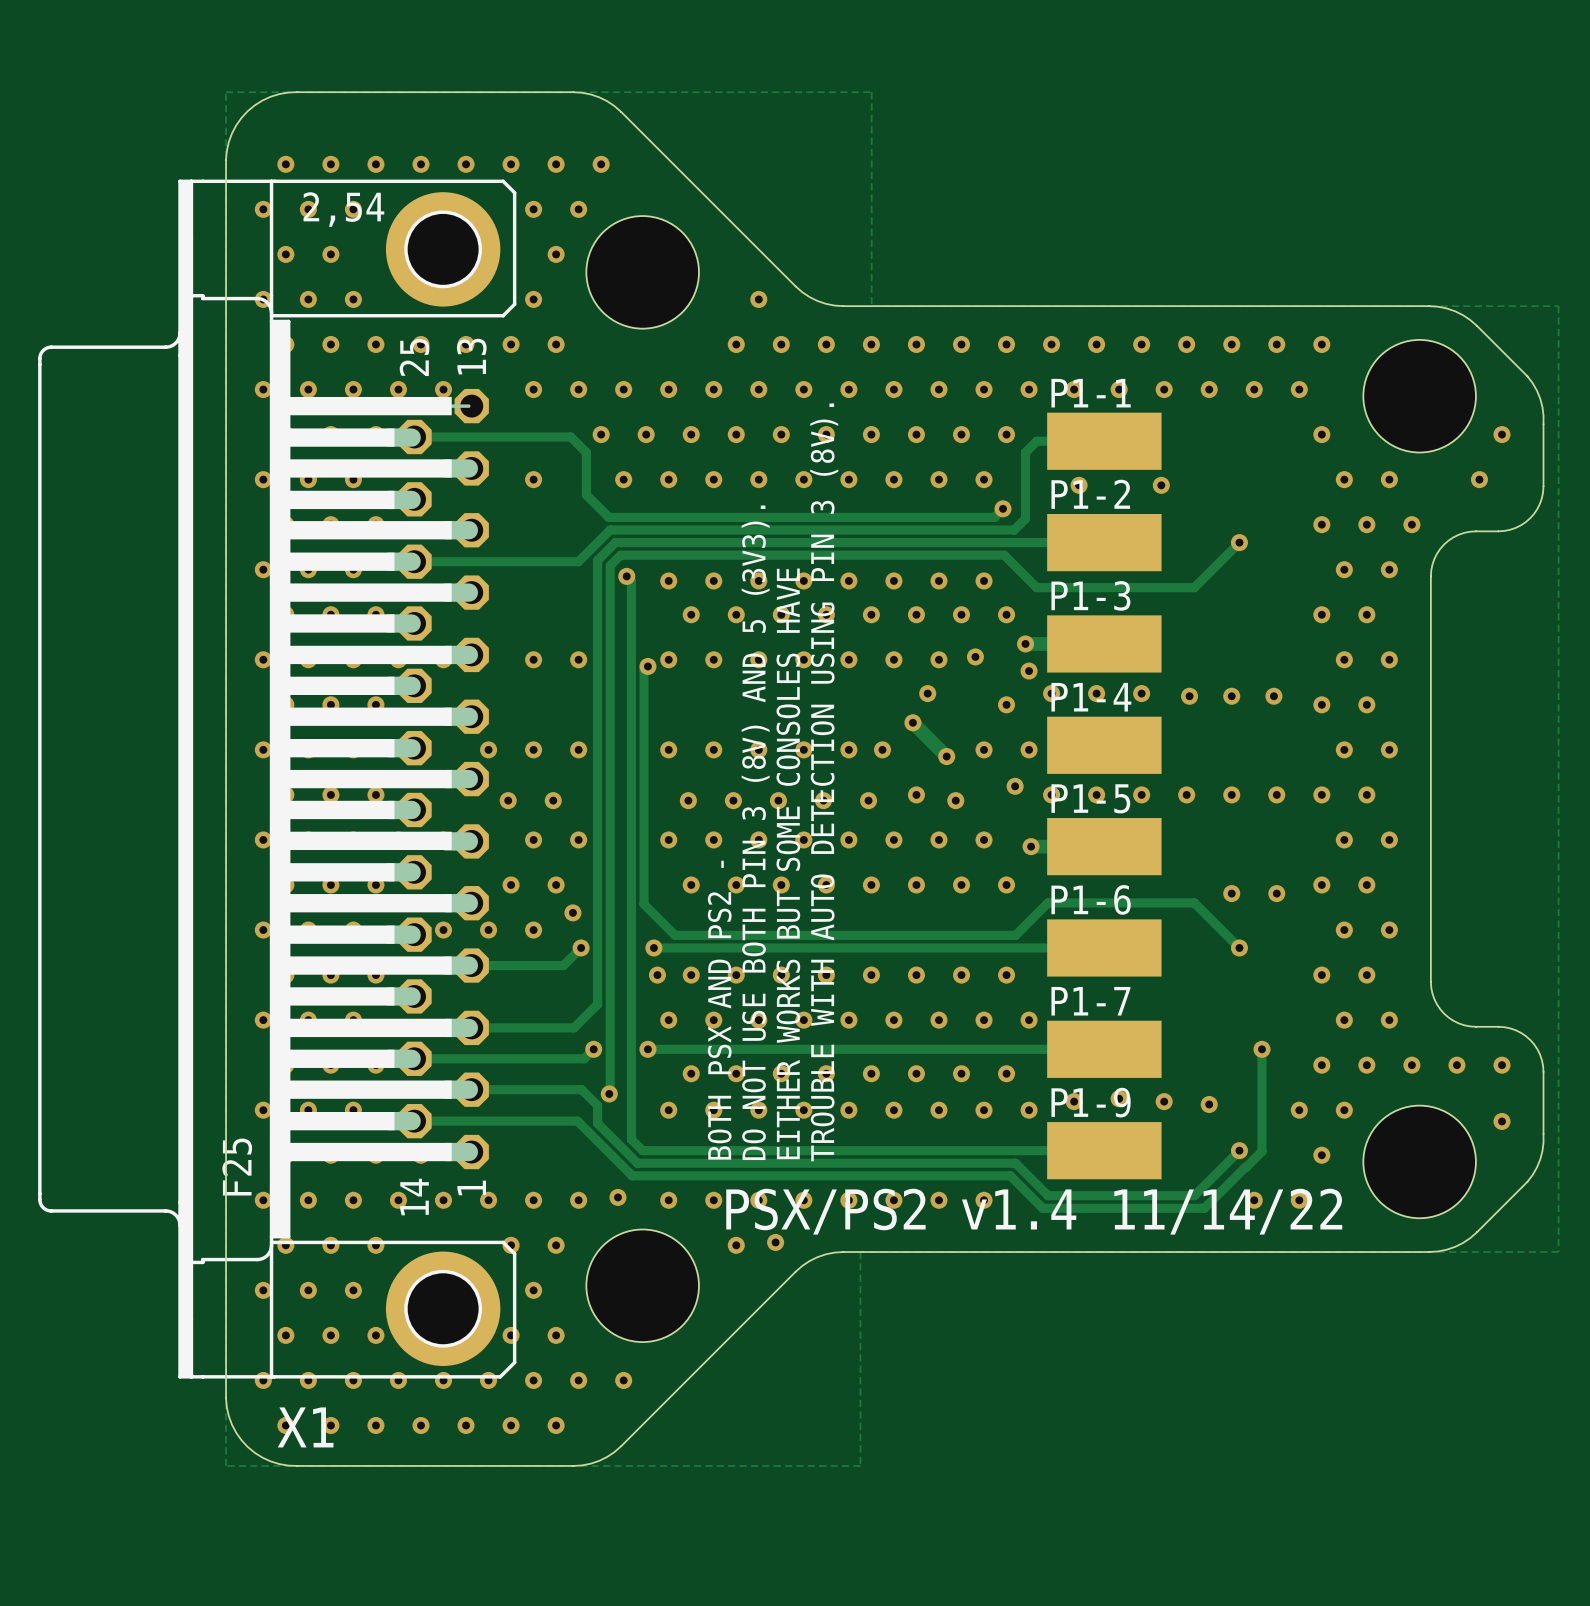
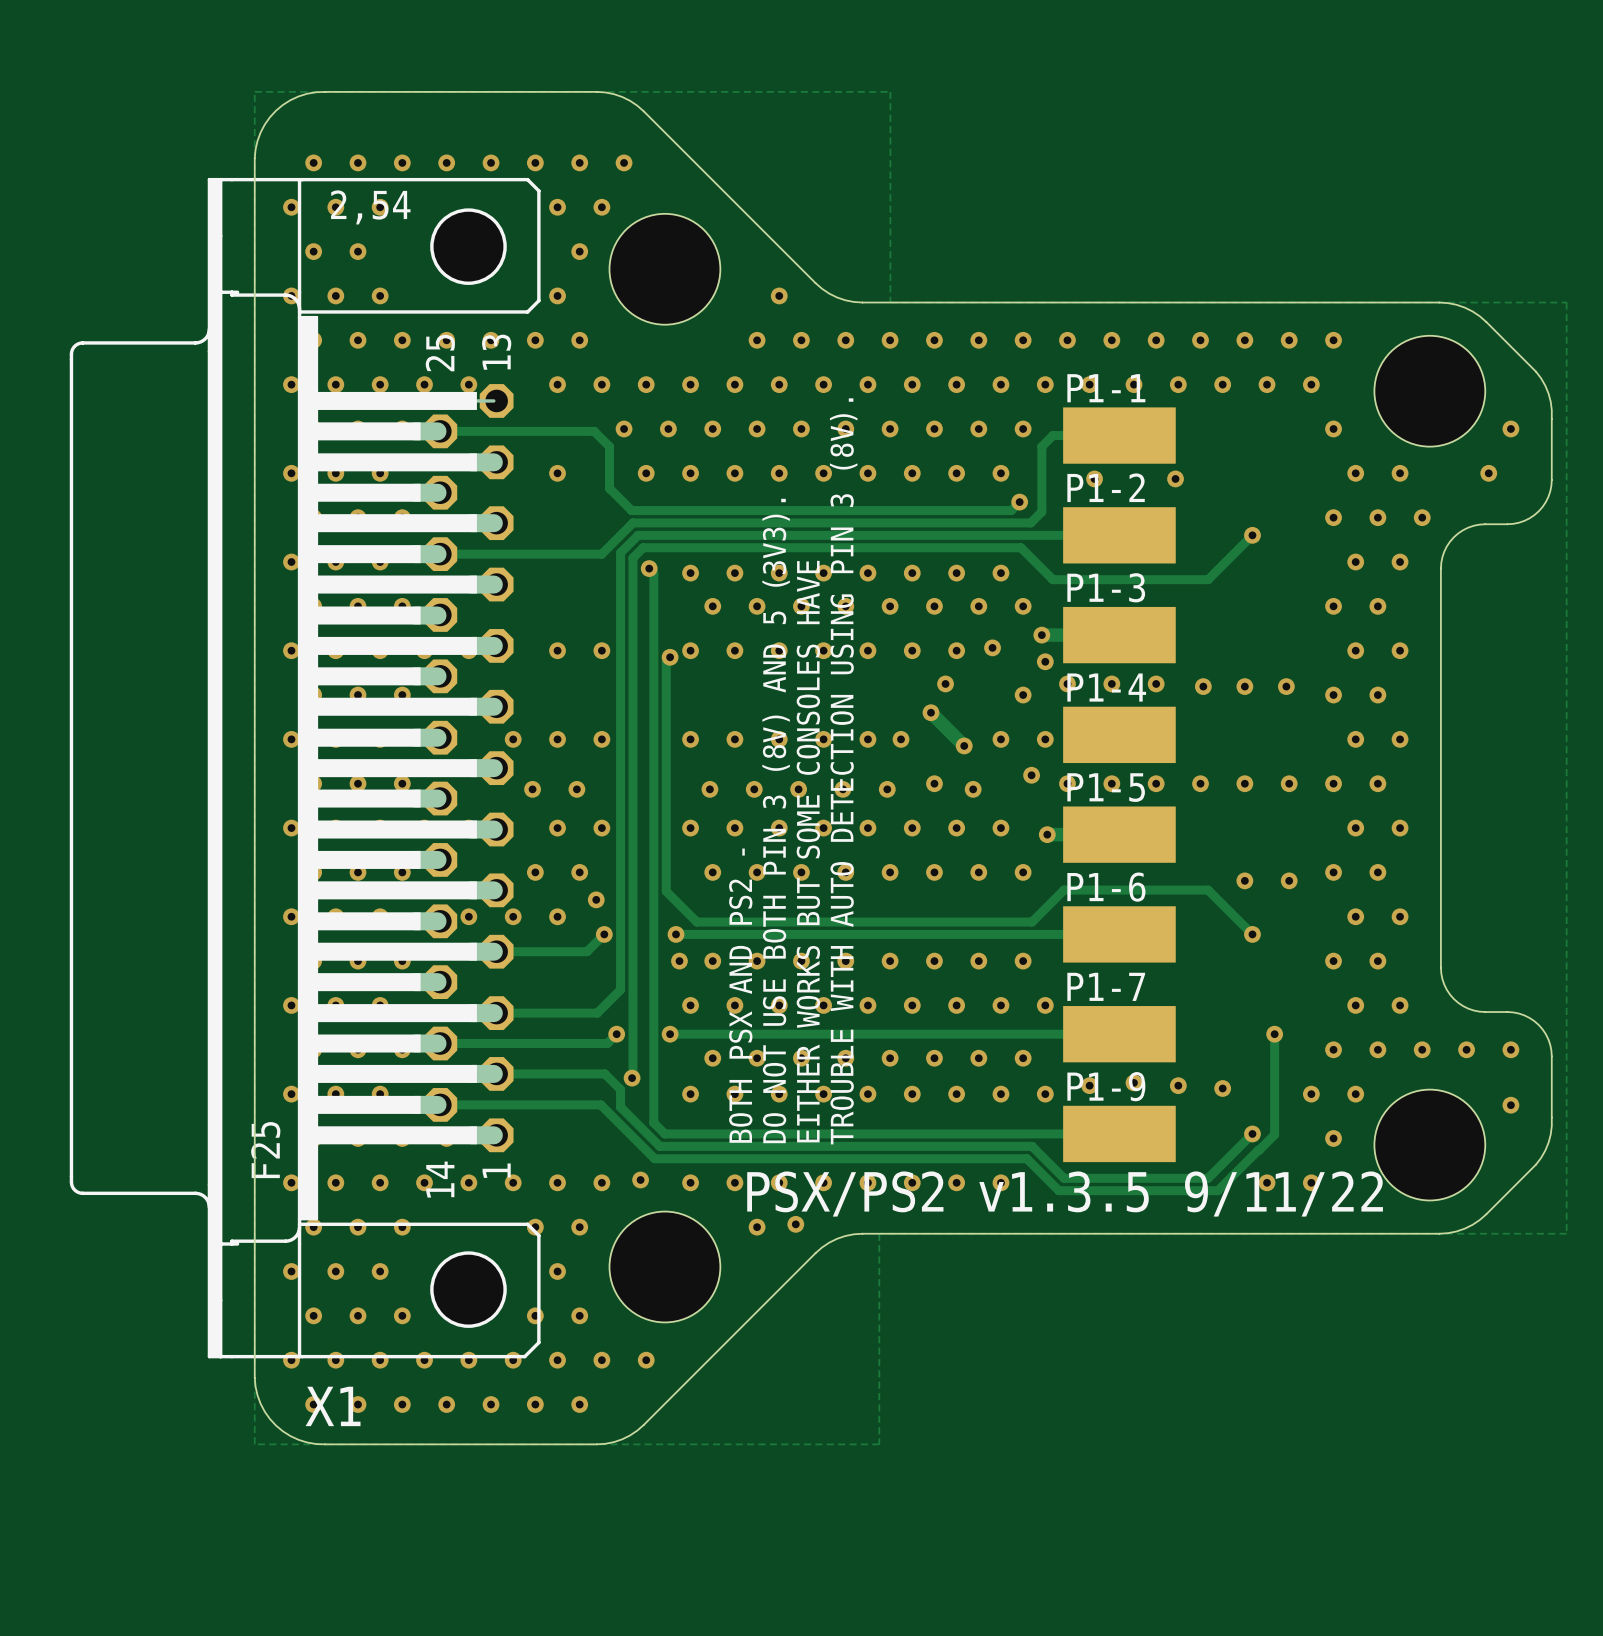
X1 footprint: [38, 179, 517, 1379] -> [69, 177, 541, 1359]
text: PSX/PS2 v1.4 11/14/22 (1034, 1211) -> PSX/PS2 v1.3.5 9/11/22 (1065, 1194)

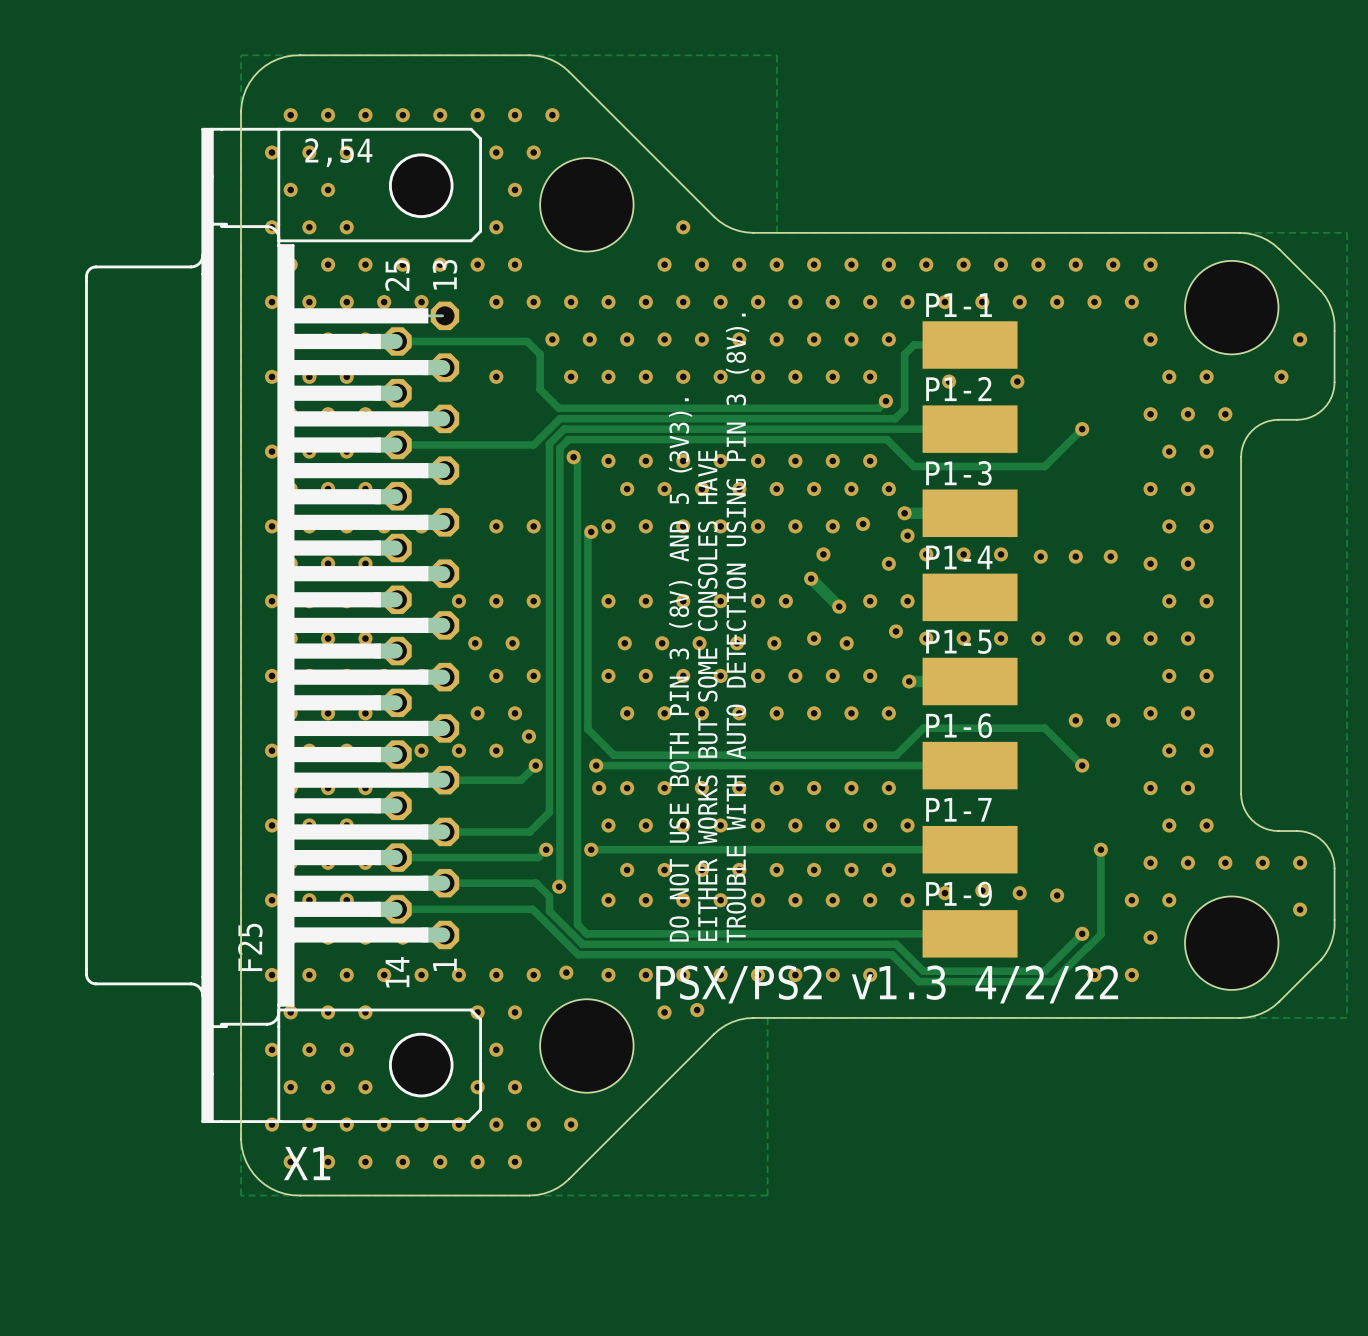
text: BOTH PSX AND PS2 - (740, 995) -> none
text: PSX/PS2 v1.3.5 9/11/22 (1065, 1194) -> PSX/PS2 v1.3 4/2/22 (887, 984)

